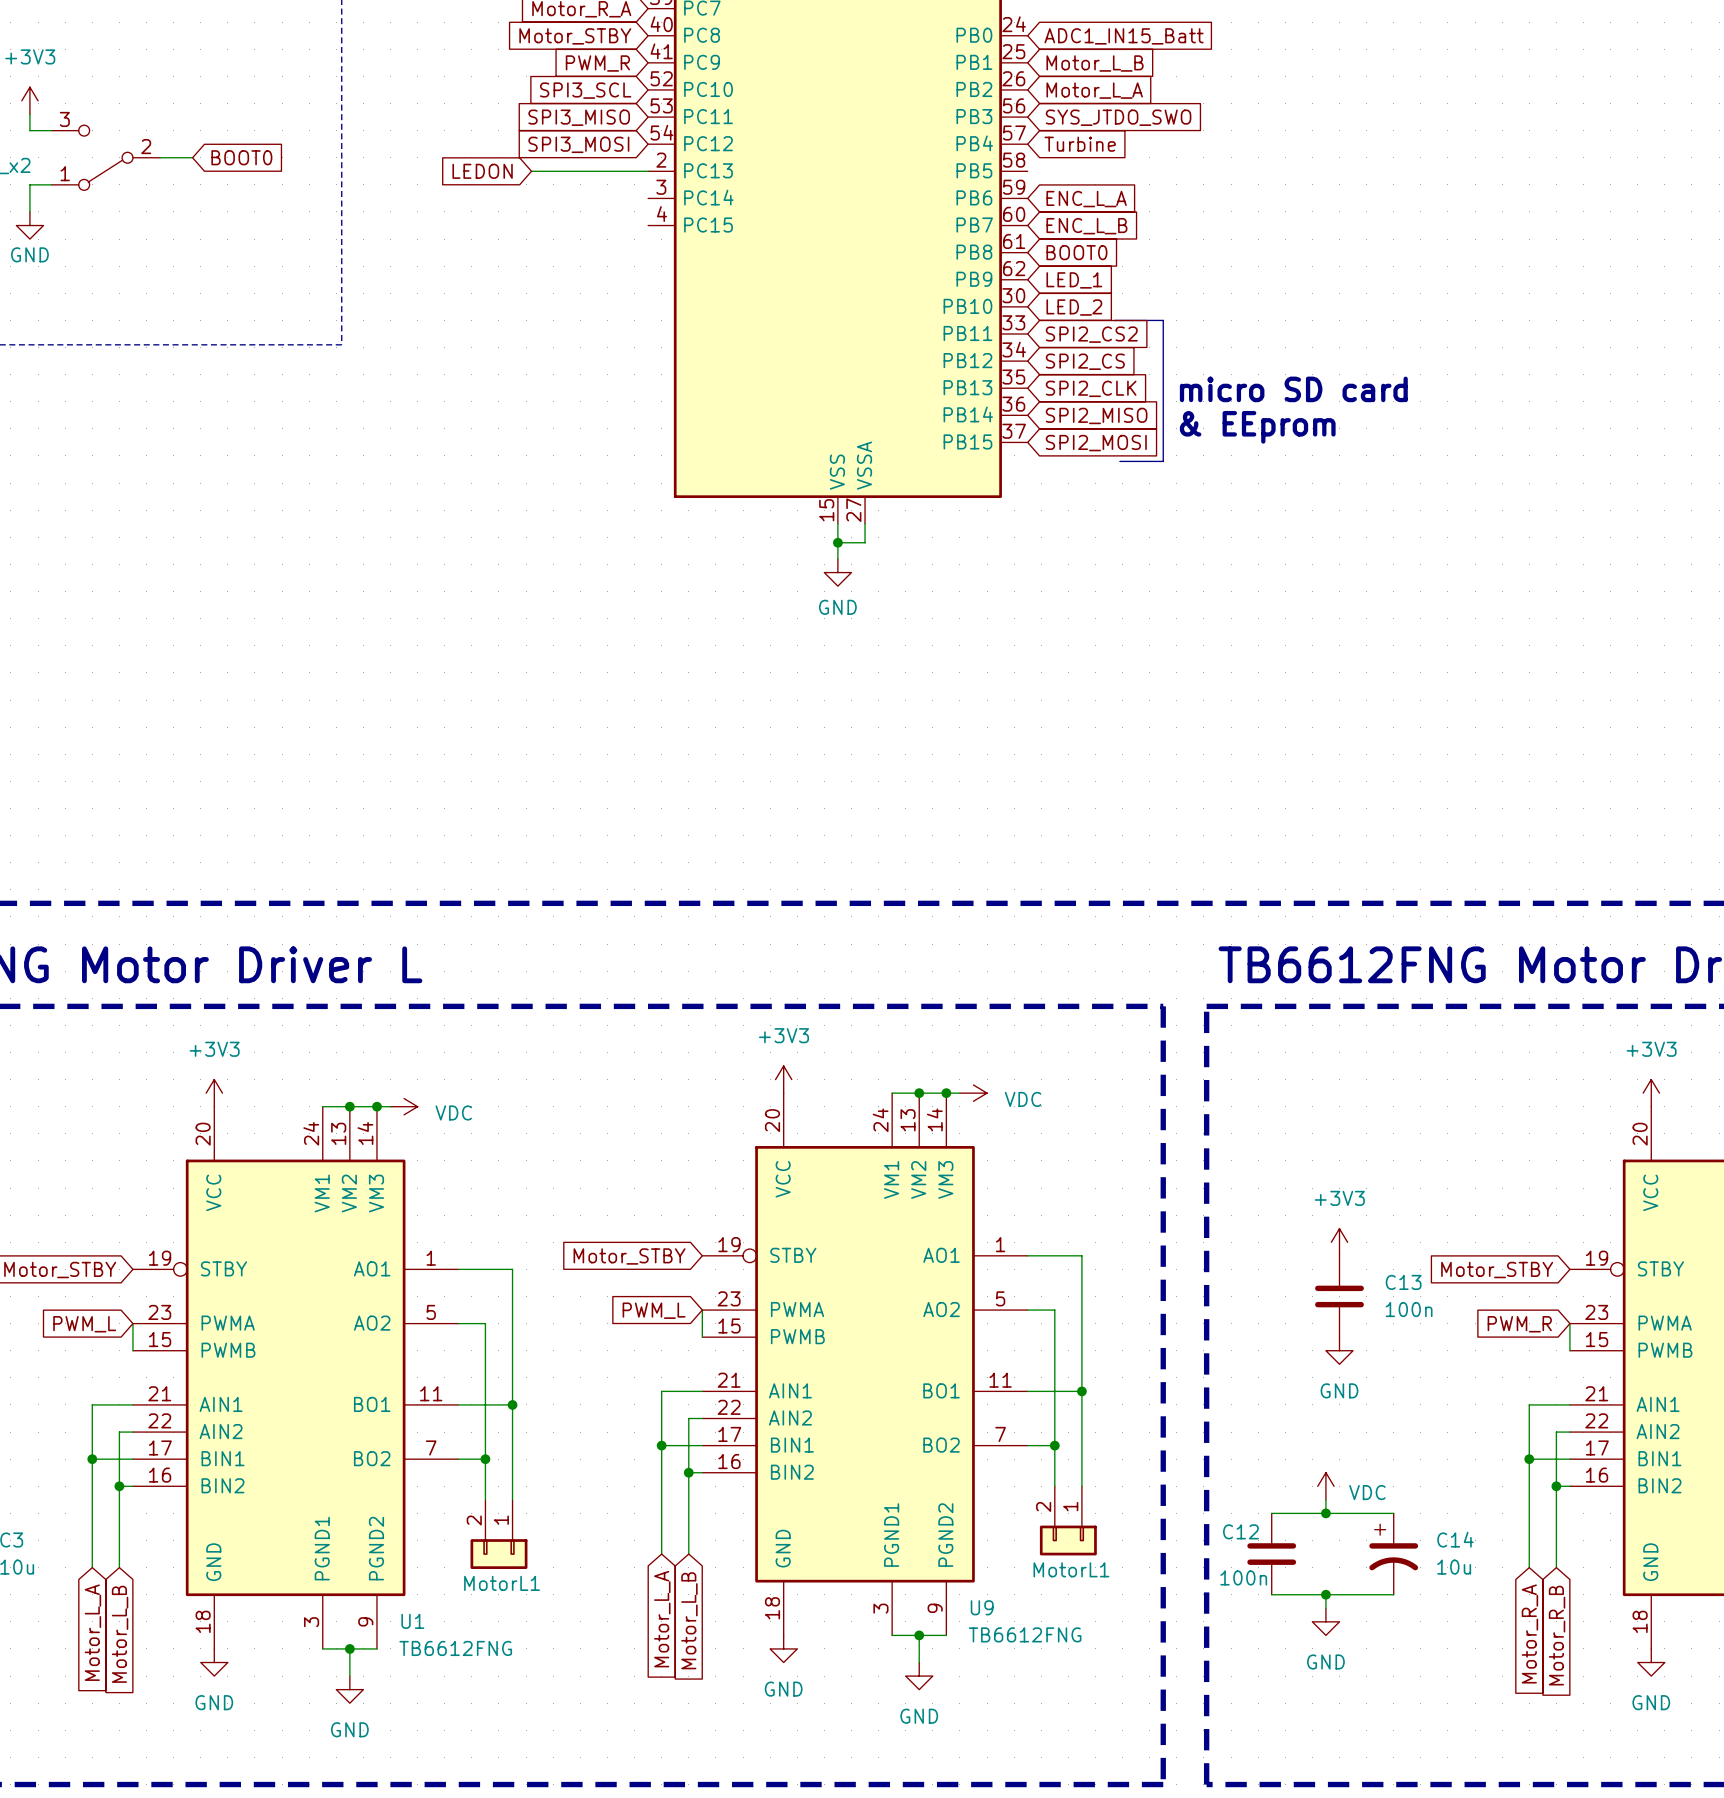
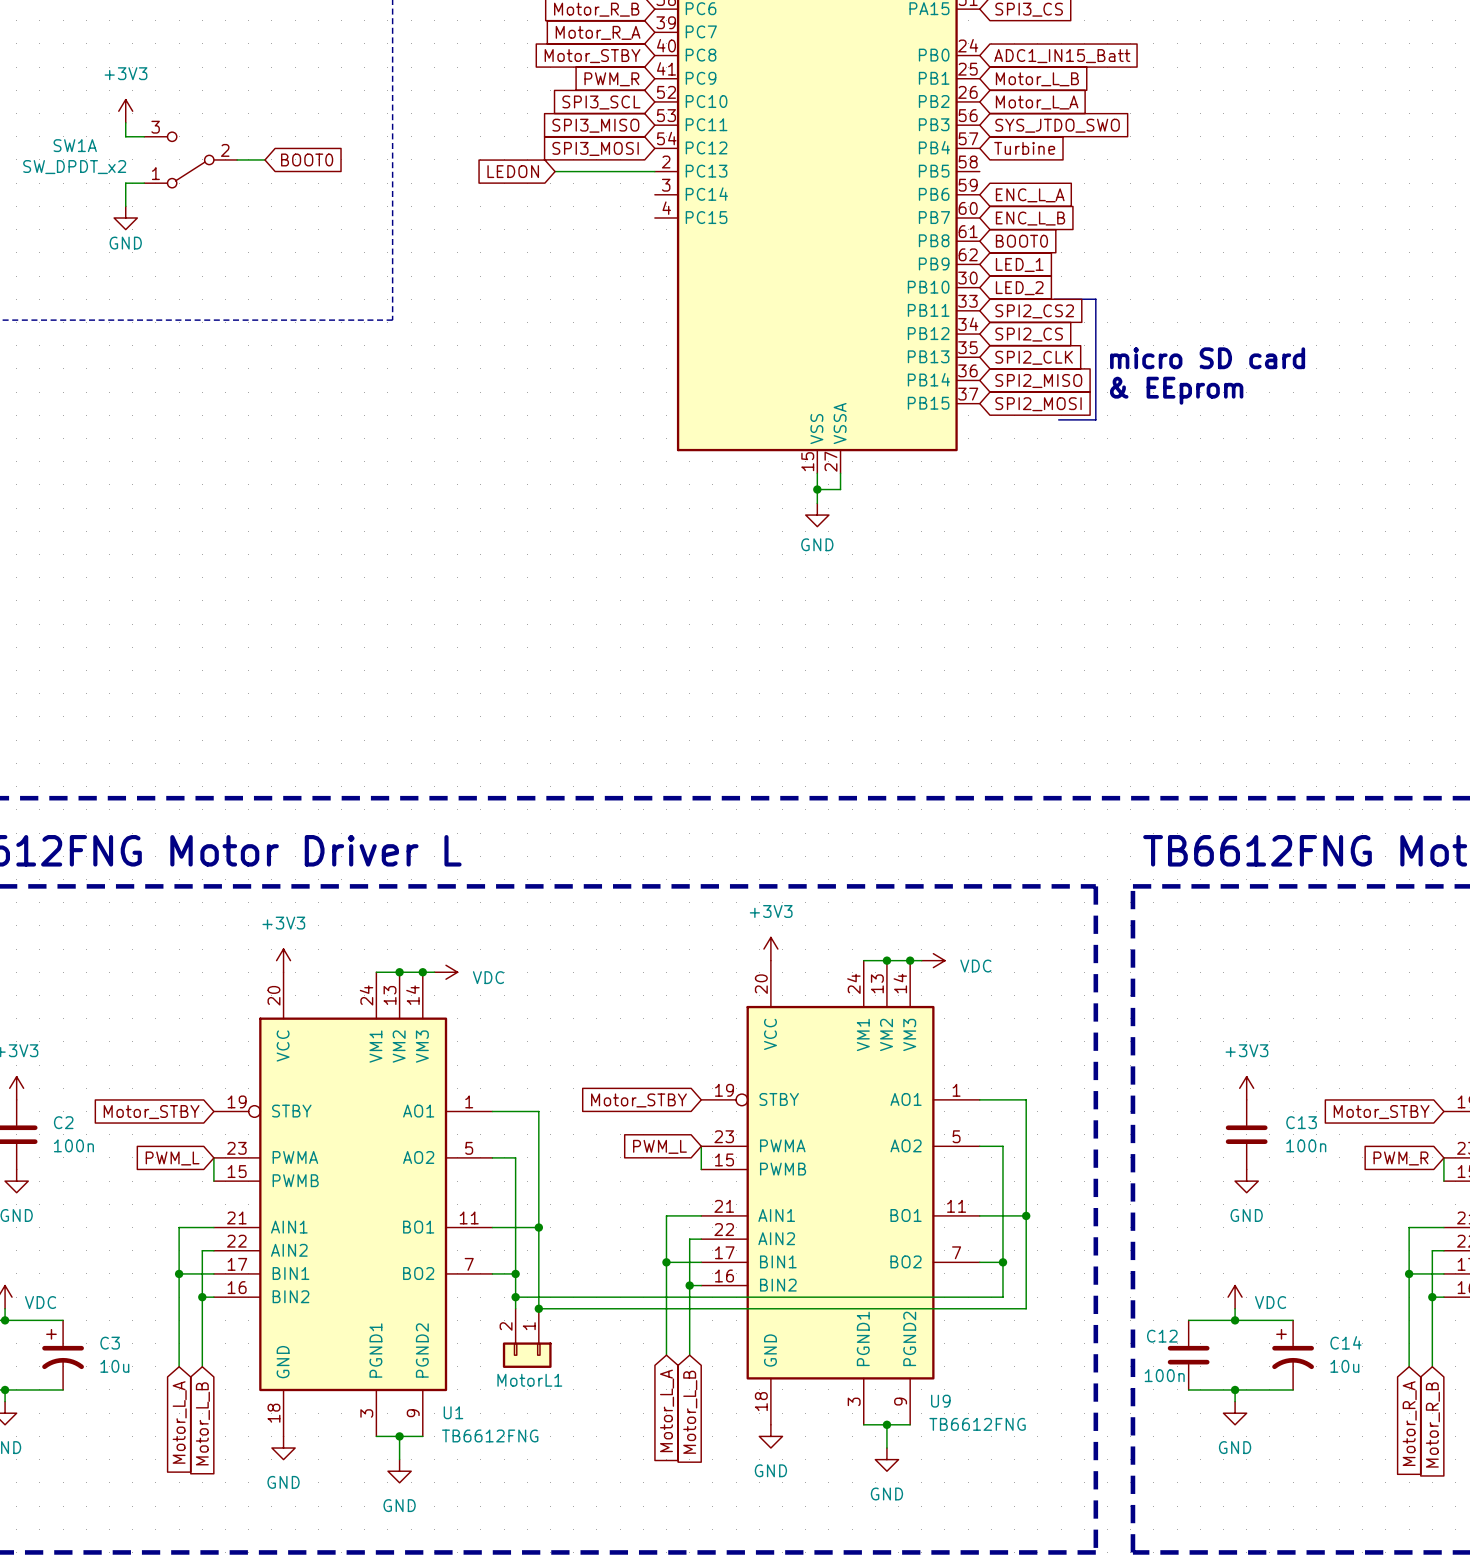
wire: none -> (515, 1297) (1002, 1297)
junction: none -> (515, 1297)
wire: none -> (1026, 1297) (1026, 1308) (538, 1308)
junction: none -> (538, 1308)
MotorL1: (1068, 1520) -> none

